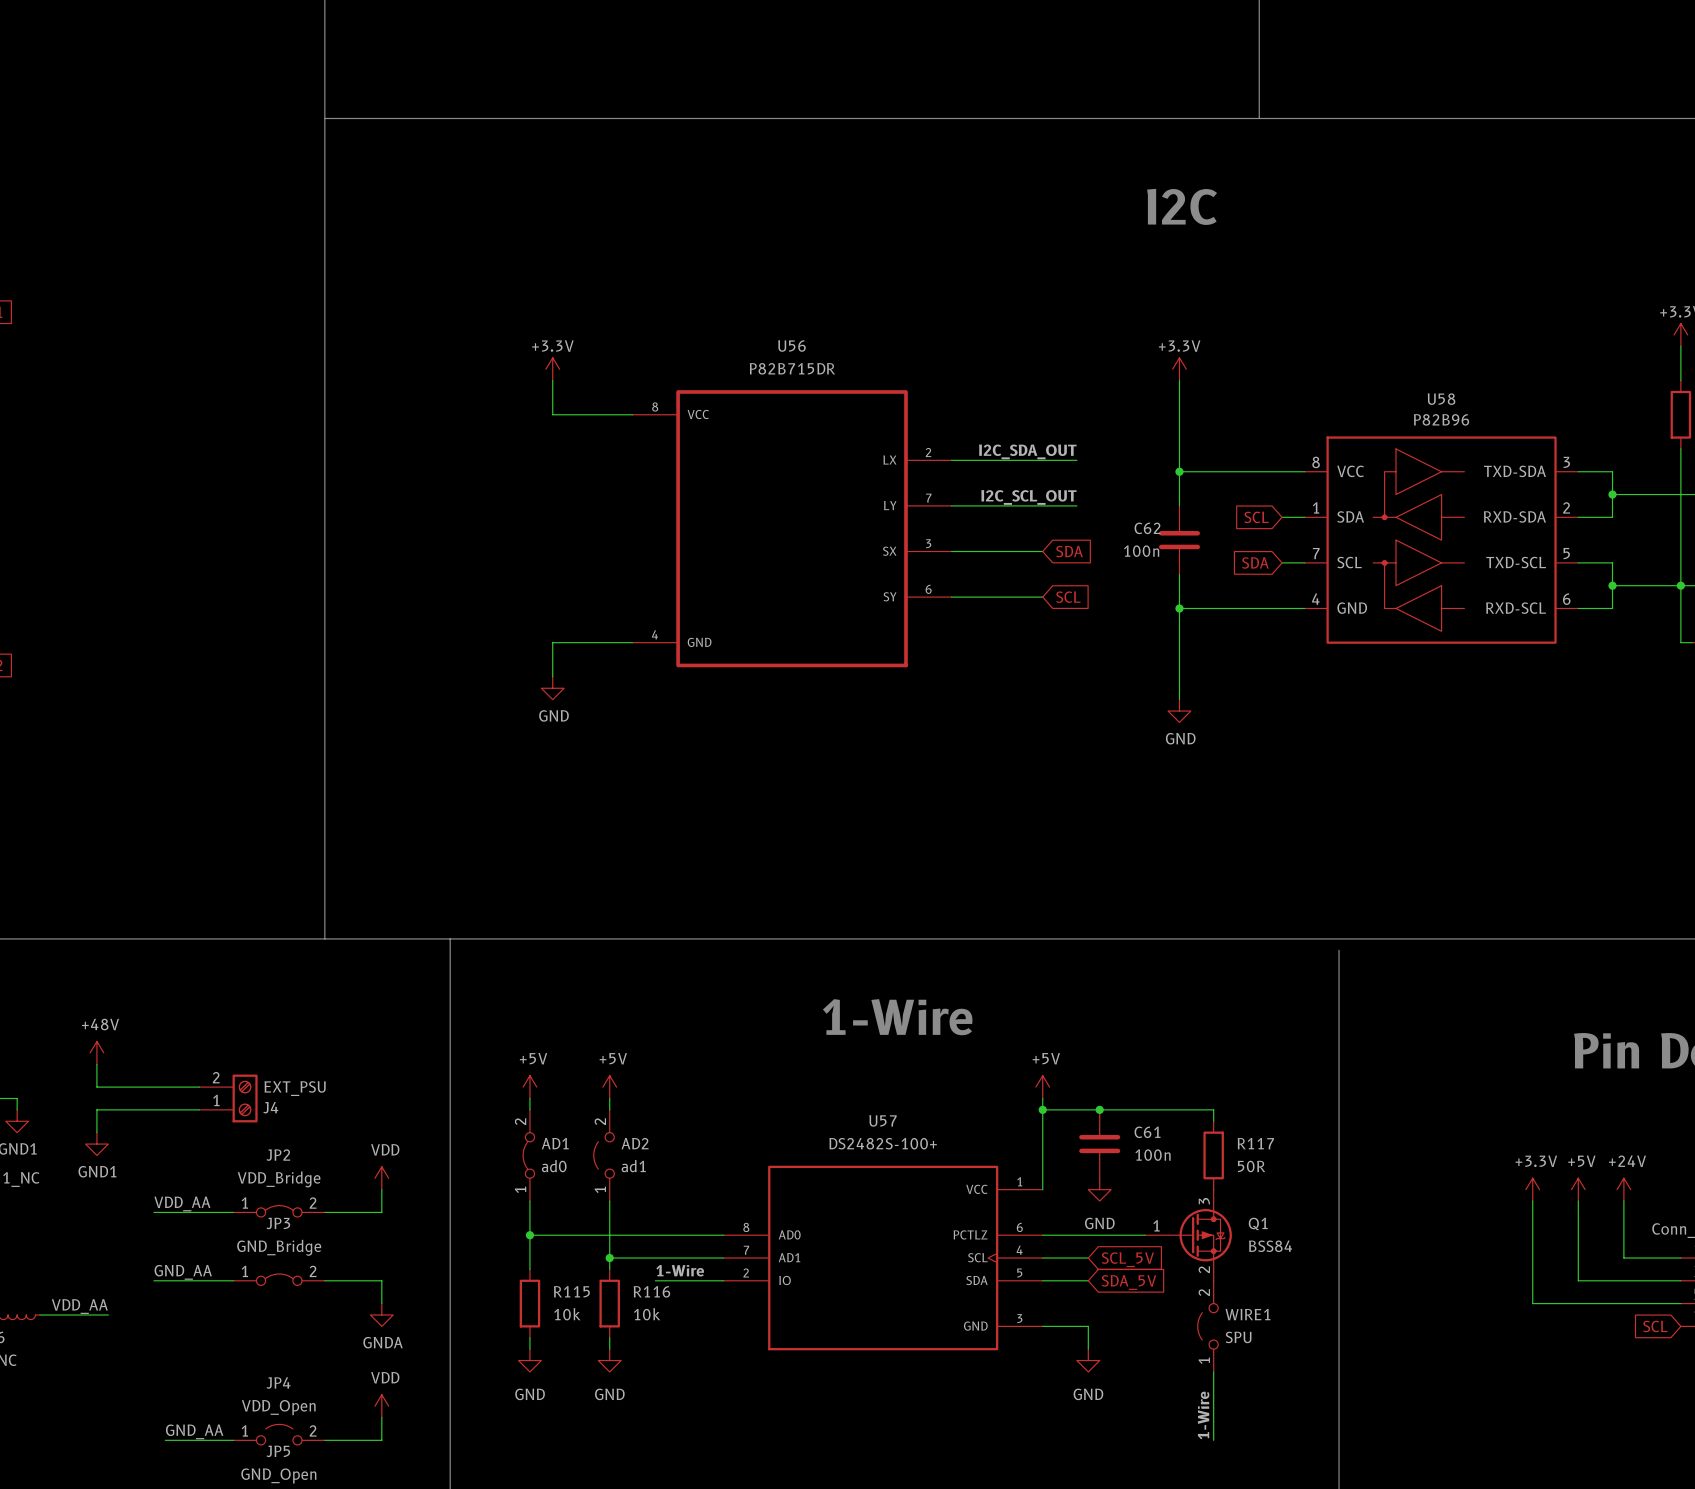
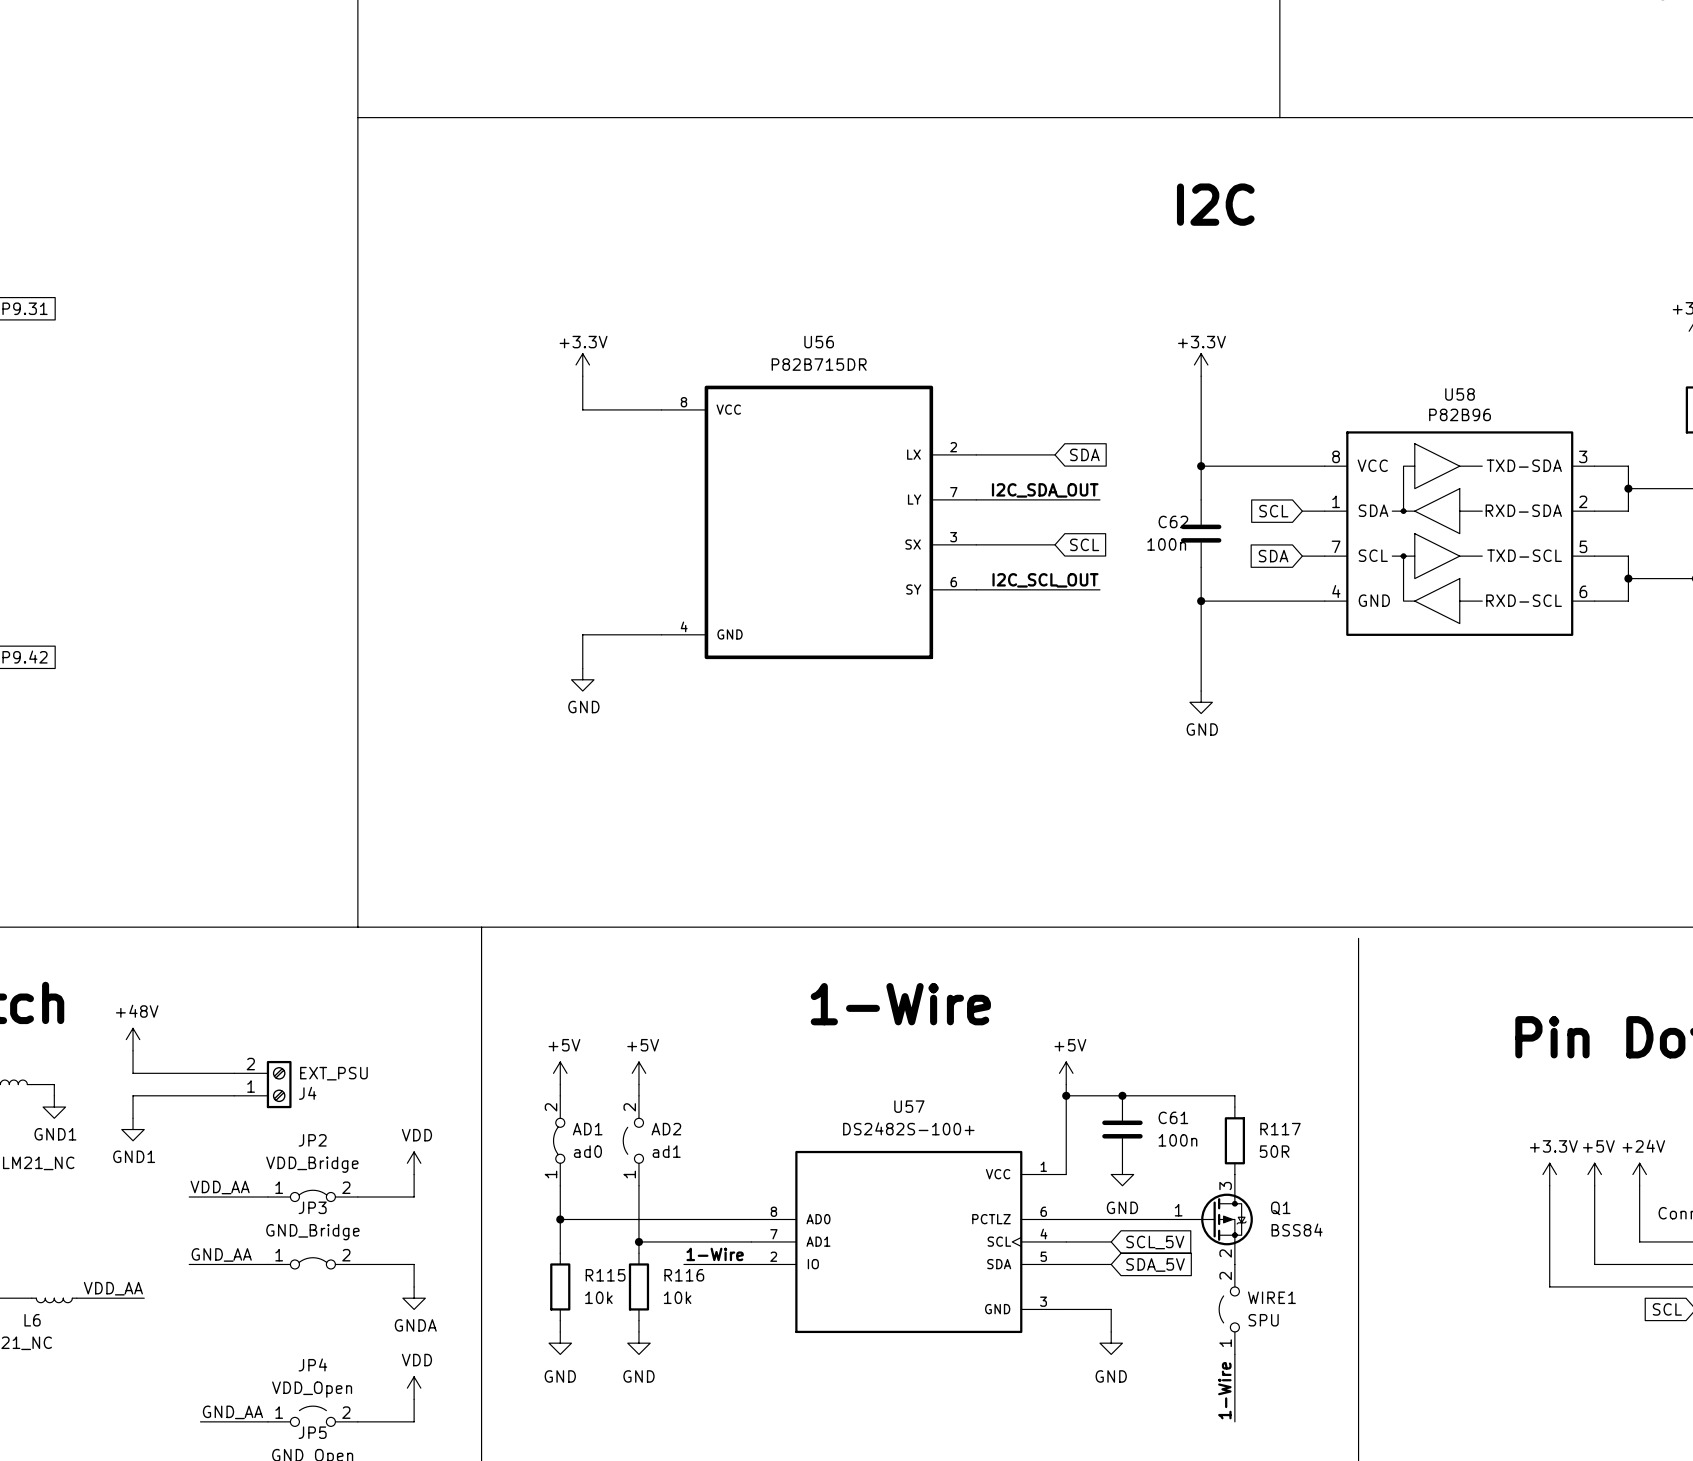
label: I2C_SDA_OUT (1027, 451) -> none
wire: (1031, 460) (1076, 460) -> none
label: I2C_SCL_OUT (1028, 497) -> I2C_SDA_OUT (1045, 490)
wire: (1031, 551) (1042, 551) -> none
global label position: SDA (1069, 551) -> SDA (1084, 454)
label: none -> I2C_SCL_OUT (1045, 580)
wire: none -> (1066, 589) (1099, 589)
global label position: SCL (1068, 597) -> SCL (1084, 544)

